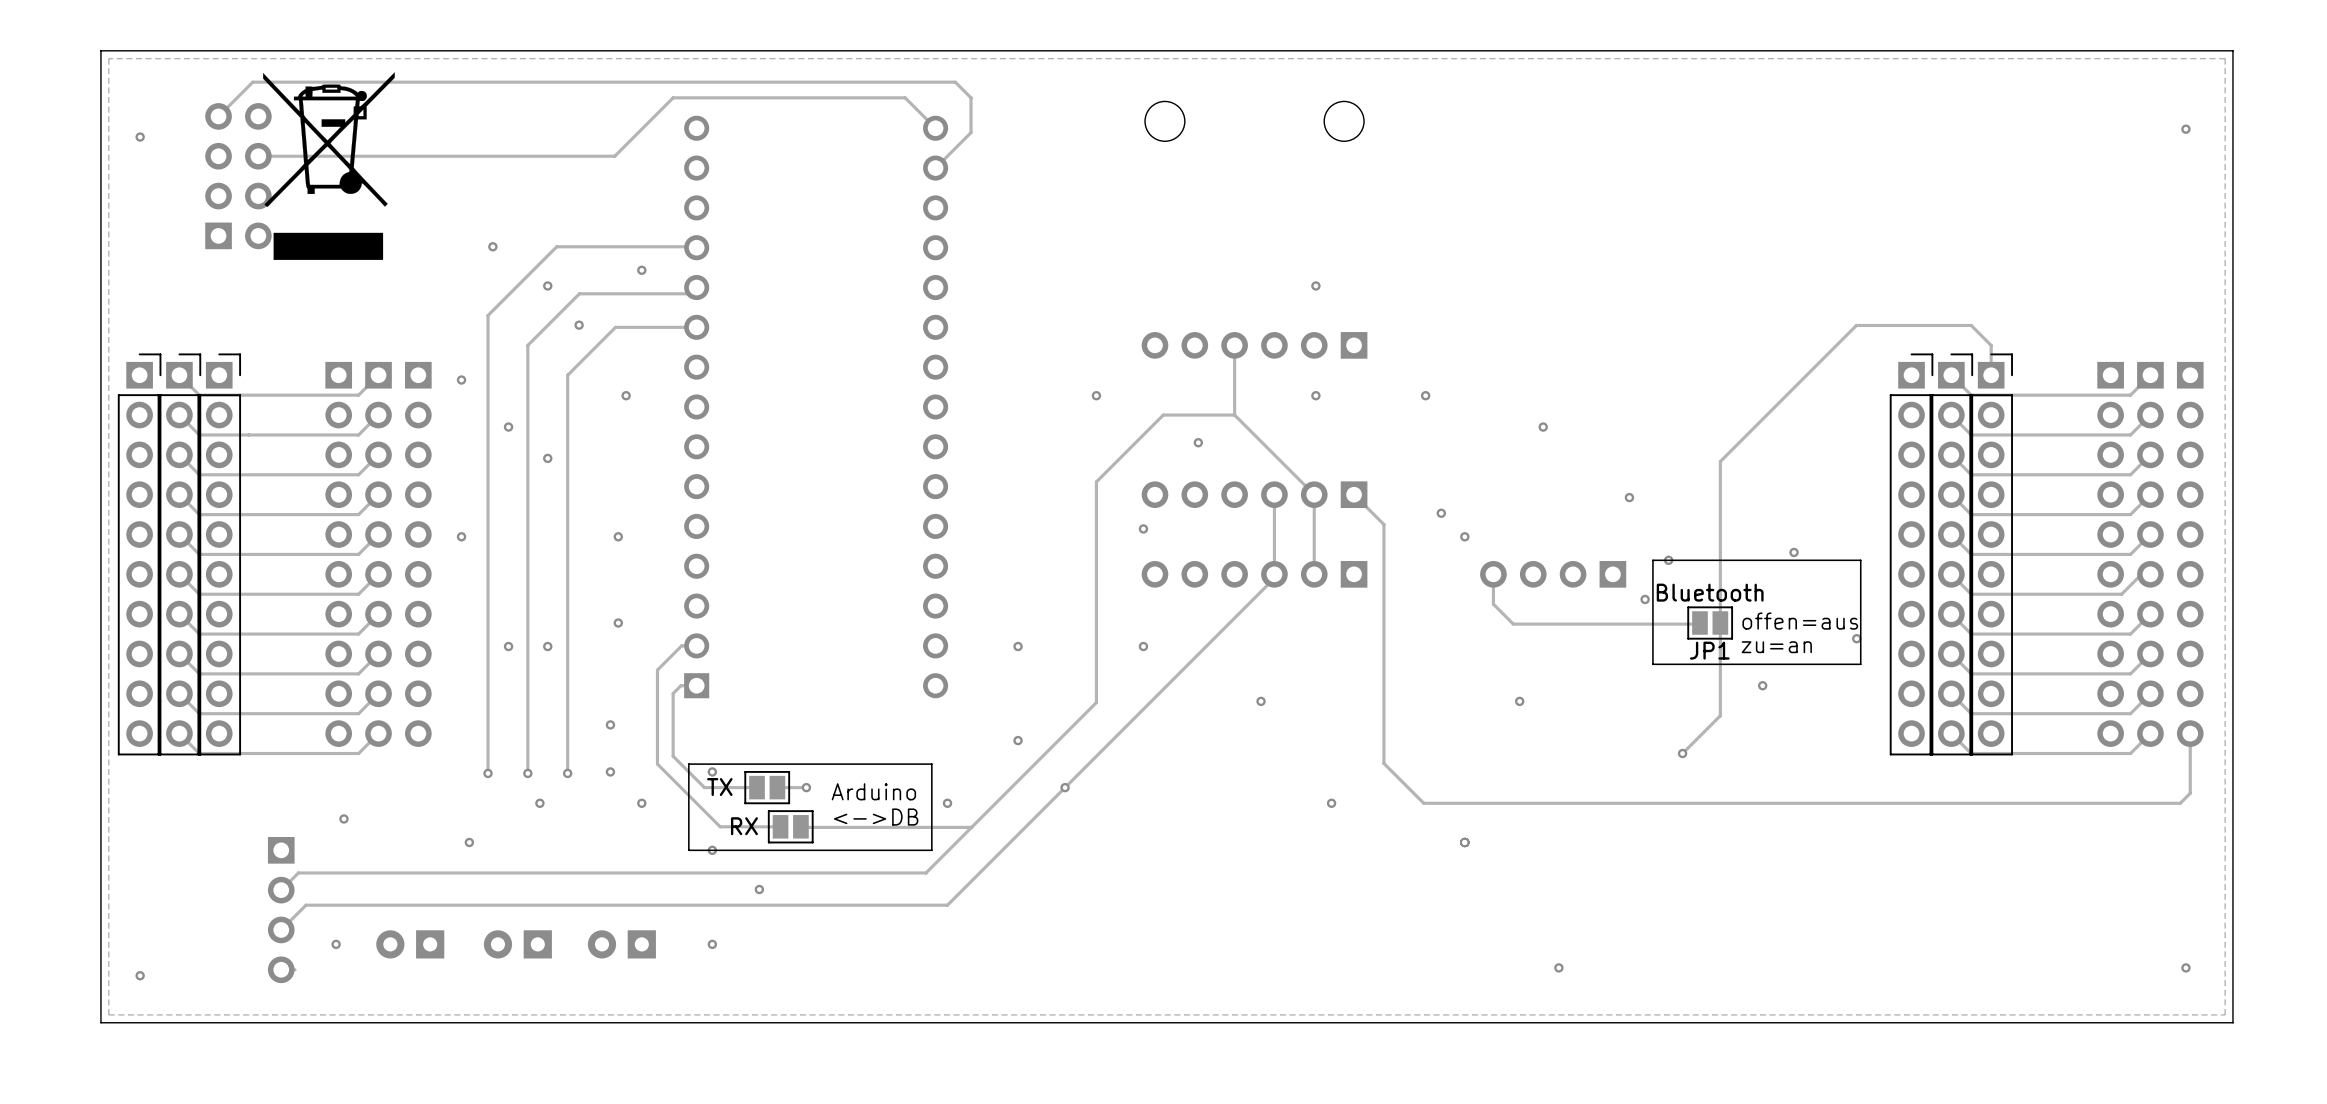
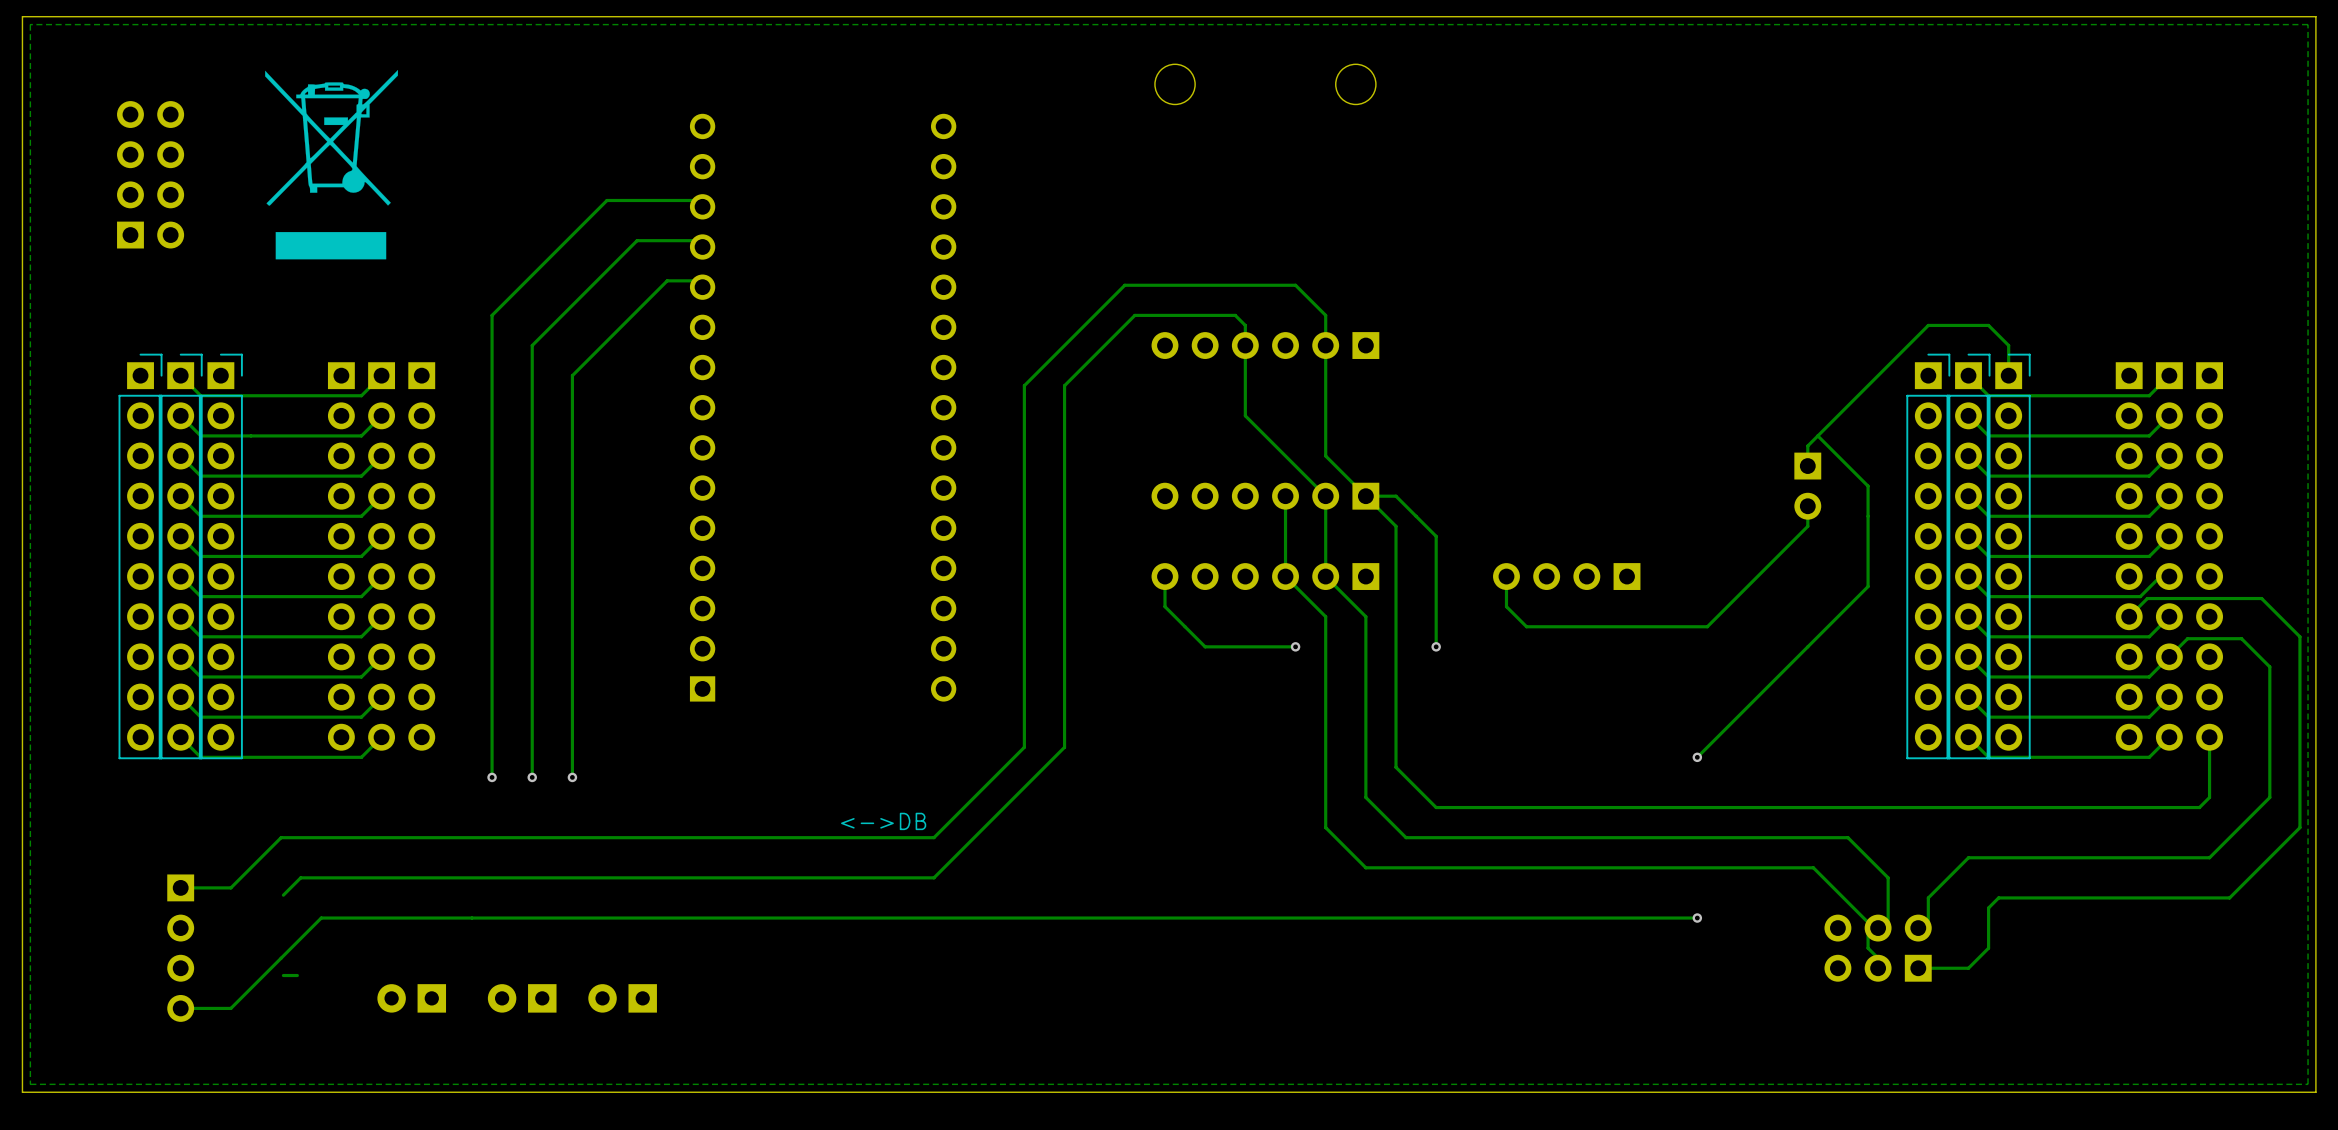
board edge: (2232, 50) (100, 50) (100, 1022) (2232, 1022) (2232, 50) -> (2315, 16) (2315, 1092) (22, 1092) (22, 16) (2315, 16)
zone outline: (2225, 58) (108, 58) (108, 1014) (2225, 1014) (2225, 58) -> (2308, 24) (2308, 1084) (30, 1084) (30, 24) (2308, 24)
track: (218, 116) (252, 82) (955, 82) (971, 97) (971, 132) (935, 168) -> none
round board edge position: (1164, 121) -> (1175, 84)
round board edge position: (1344, 121) -> (1355, 84)
track: (935, 128) (905, 97) (673, 97) (614, 156) (258, 156) -> none
via: (2185, 129) -> none
via: (140, 137) -> none
part position: (238, 176) -> (150, 174)
via: (492, 246) -> none
track: (556, 246) (696, 247) -> (561, 246) (606, 200) (698, 200)
via: (641, 270) -> none
via: (547, 285) -> none
via: (1315, 285) -> none
track: (696, 287) (690, 293) (579, 293) -> (698, 240) (637, 240) (584, 293)
via: (579, 325) -> none
track: (1911, 325) (1856, 325) (1720, 461) (1720, 715) -> (1817, 435) (1868, 486) (1868, 586) (1735, 719)
track: none -> (1928, 325) (1807, 445) (1807, 466)
track: (696, 327) (615, 327) -> (698, 280) (667, 280) (620, 327)
via: (461, 380) -> none
via: (626, 395) -> none
via: (1096, 395) -> none
via: (1315, 395) -> none
via: (1425, 395) -> none
track: (1234, 415) (1163, 415) (1096, 481) (1096, 702) (1055, 743) -> (1245, 345) (1245, 325) (1235, 315) (1134, 315) (1064, 385) (1064, 747)
via: (508, 427) -> none
via: (1543, 427) -> none
via: (1198, 442) -> none
via: (547, 458) -> none
part: none -> (1807, 486)
via: (1629, 497) -> none
track: none -> (1807, 506) (1807, 526) (1707, 626)
via: (1441, 513) -> none
via: (1143, 528) -> none
via: (461, 536) -> none
via: (618, 536) -> none
via: (1464, 536) -> none
via: (1794, 552) -> none
via: (1668, 560) -> none
line: (1860, 560) (1652, 560) (1652, 664) (1860, 664) (1860, 560) -> none
track: none -> (1164, 576) (1164, 606) (1205, 646) (1295, 646)
track: (1274, 574) (1274, 578) (947, 905) (306, 905) (281, 929) -> none
track: none -> (1327, 578) (1365, 616) (1365, 797) (1406, 837) (1847, 837) (1888, 877) (1888, 928)
track: none -> (1287, 578) (1325, 616) (1325, 827) (1365, 867) (1813, 867) (1868, 922) (1868, 948) (1888, 968)
via: (1645, 599) -> none
track: none -> (2129, 616) (2147, 598) (2261, 598) (2299, 636) (2299, 827) (2229, 897) (1998, 897) (1988, 907) (1988, 948) (1968, 968) (1928, 968)
text: offen=aus (1800, 621) -> none
via: (618, 623) -> none
JP1: Bluetooth (1710, 623) -> none
via: (1856, 638) -> none
track: none -> (1436, 646) (1436, 536) (1396, 496) (1365, 496) (1325, 456) (1325, 315) (1295, 285) (1124, 285) (1024, 385) (1024, 747) (933, 837) (281, 837) (230, 887) (180, 887)
via: none -> (1436, 646)
track: (696, 645) (681, 645) (657, 670) (657, 764) (720, 826) (780, 826) -> none
via: (508, 646) -> none
via: (547, 646) -> none
via: (1018, 646) -> none
via: (1143, 646) -> none
text: zu=an (1776, 647) -> none
track: none -> (2169, 656) (2187, 638) (2241, 638) (2269, 666) (2269, 797) (2209, 857) (1968, 857) (1928, 897) (1928, 928)
track: (696, 685) (681, 685) (673, 693) (673, 756) (704, 787) (757, 787) -> none
via: (1762, 685) -> none
via position: (1261, 701) -> (1295, 646)
via: (1519, 701) -> none
via: (610, 724) -> none
via: (1018, 740) -> none
line: (931, 764) (688, 764) (688, 850) (931, 850) (931, 764) -> none
via: (610, 771) -> none
via: (712, 771) -> none
part: TX (767, 787) -> none
track: (806, 787) (777, 787) -> none
via: (806, 787) -> none
via: (1065, 787) -> none
text: Arduino (873, 791) -> none
via: (539, 803) -> none
via: (641, 803) -> none
via: (947, 803) -> none
via: (1331, 803) -> none
via: (343, 818) -> none
part: RX (790, 826) -> none
track: (800, 826) (971, 827) -> none
via: (469, 842) -> none
via: (1464, 842) -> none
via: (712, 850) -> none
via: (759, 889) -> none
part position: (281, 910) -> (180, 948)
track: none -> (1697, 918) (321, 918) (230, 1008) (180, 1008)
via: none -> (1697, 918)
part: none -> (1878, 948)
via: (336, 944) -> none
part position: (410, 944) -> (411, 998)
part position: (517, 944) -> (522, 998)
part position: (621, 944) -> (622, 998)
via: (712, 944) -> none
via: (1558, 967) -> none
via: (2185, 967) -> none
via: (140, 975) -> none

